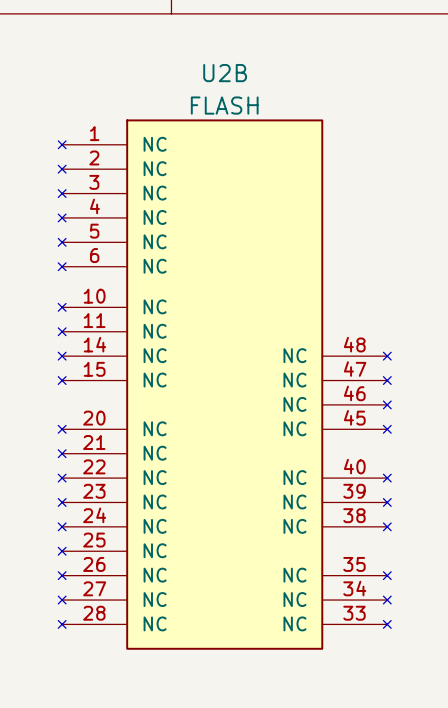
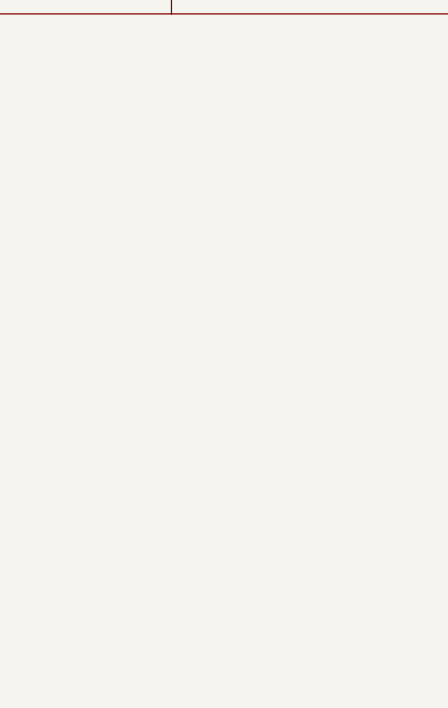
U2B: FLASH (224, 384) -> none

